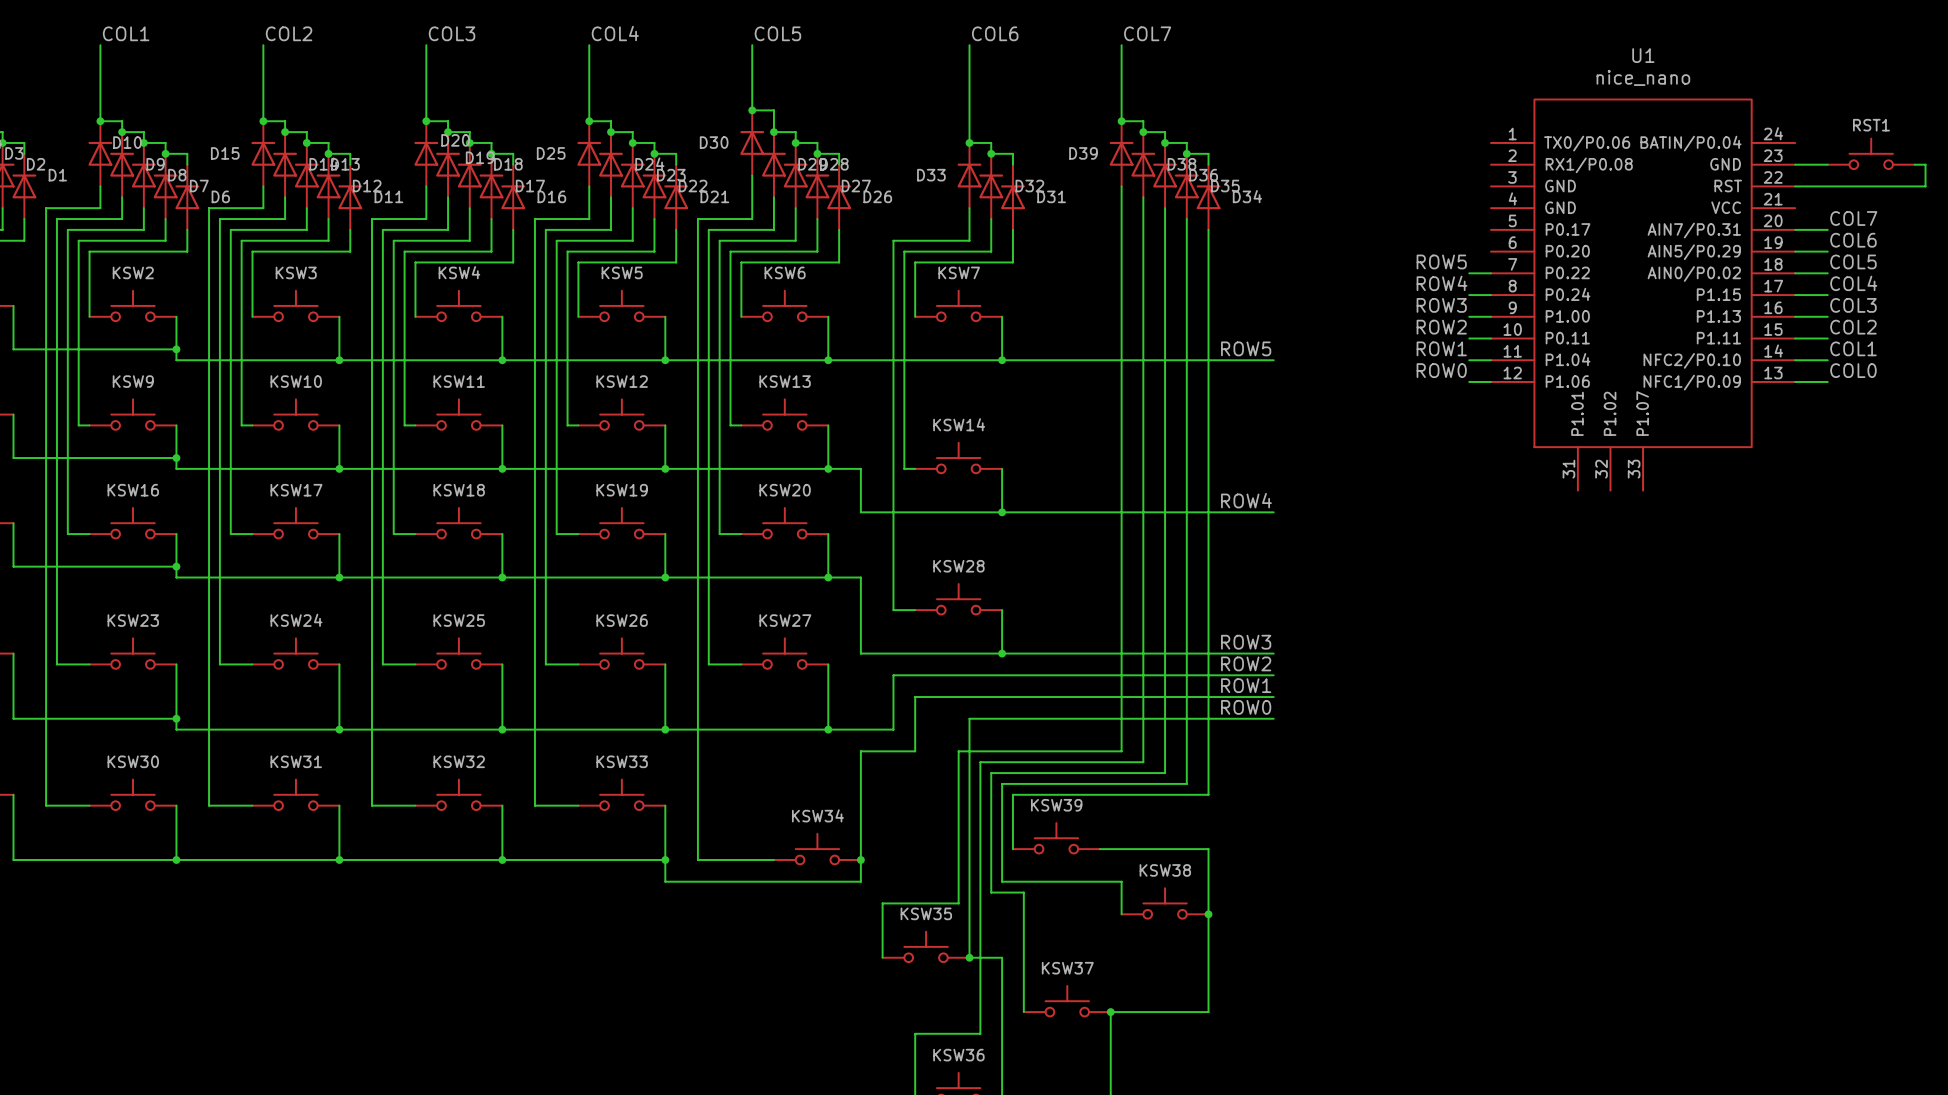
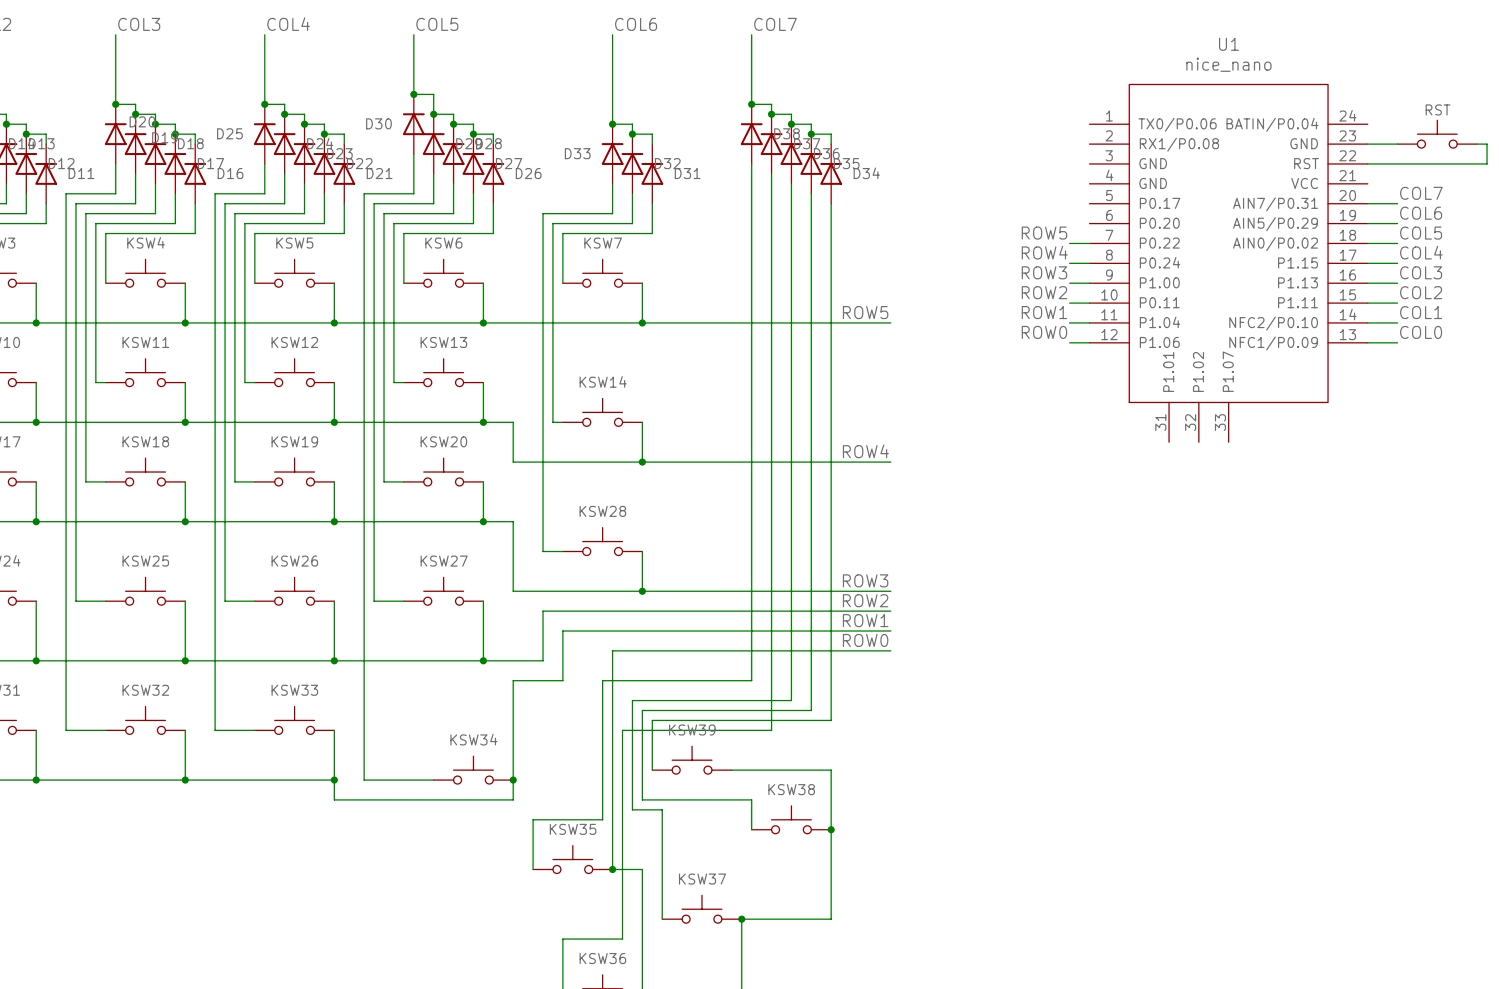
RST1 name: RST1 (1871, 125) -> RST (1438, 109)
D39 name: D39 (1083, 153) -> D38 (787, 133)
D38 name: D38 (1181, 164) -> D37 (807, 143)
wire: (1143, 762) (980, 762) (980, 805) -> (771, 690) (771, 730) (622, 730)

